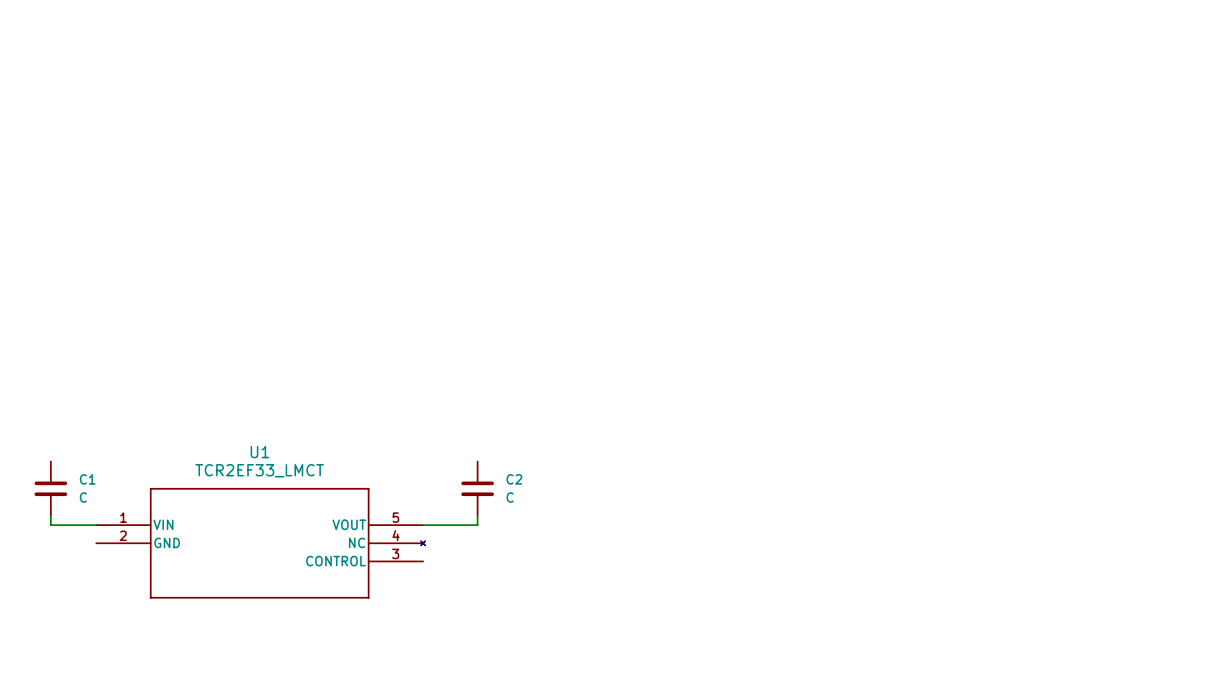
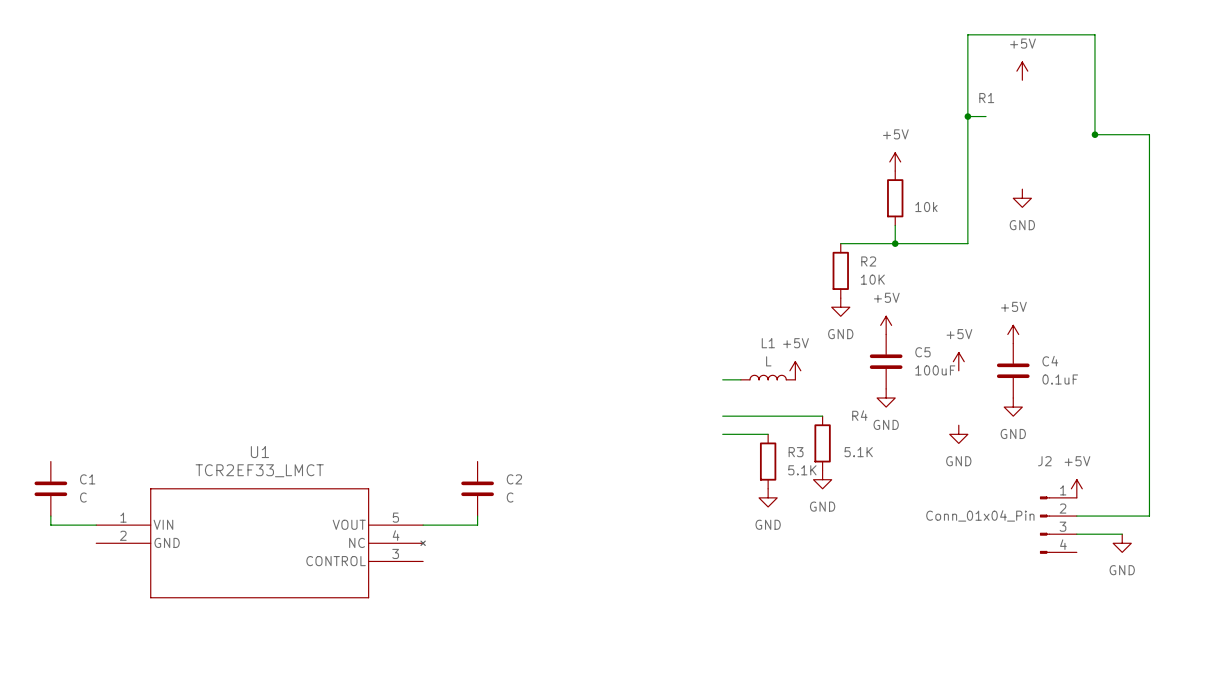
power symbol: none -> +5V (1022, 71)
wire: none -> (967, 116) (986, 116)
junction: none -> (967, 116)
junction: none -> (1094, 134)
power symbol: none -> +5V (895, 161)
R1: none -> 10k (895, 198)
power symbol: none -> GND (1022, 198)
wire: none -> (895, 225) (895, 243)
wire: none -> (840, 243) (967, 243) (967, 34) (1094, 34) (1094, 134) (1149, 134) (1149, 516) (1076, 516)
junction: none -> (895, 243)
R2: none -> 10K (840, 270)
power symbol: none -> GND (840, 307)
power symbol: none -> +5V (886, 325)
power symbol: none -> +5V (1013, 334)
C5: none -> 100uF (886, 361)
power symbol: none -> +5V (958, 361)
power symbol: none -> +5V (795, 370)
C4: none -> 0.1uF (1013, 370)
L1: none -> L (768, 377)
wire: none -> (722, 379) (740, 379)
power symbol: none -> GND (886, 398)
power symbol: none -> GND (1013, 407)
wire: none -> (722, 416) (822, 416)
wire: none -> (722, 434) (768, 434)
power symbol: none -> GND (958, 434)
R4: none -> 5.1K (822, 443)
R3: none -> 5.1K (768, 461)
power symbol: none -> GND (822, 479)
power symbol: none -> +5V (1076, 488)
power symbol: none -> GND (768, 497)
J2: none -> Conn_01x04_Pin (1058, 525)
wire: none -> (1076, 534) (1122, 534)
power symbol: none -> GND (1122, 543)

